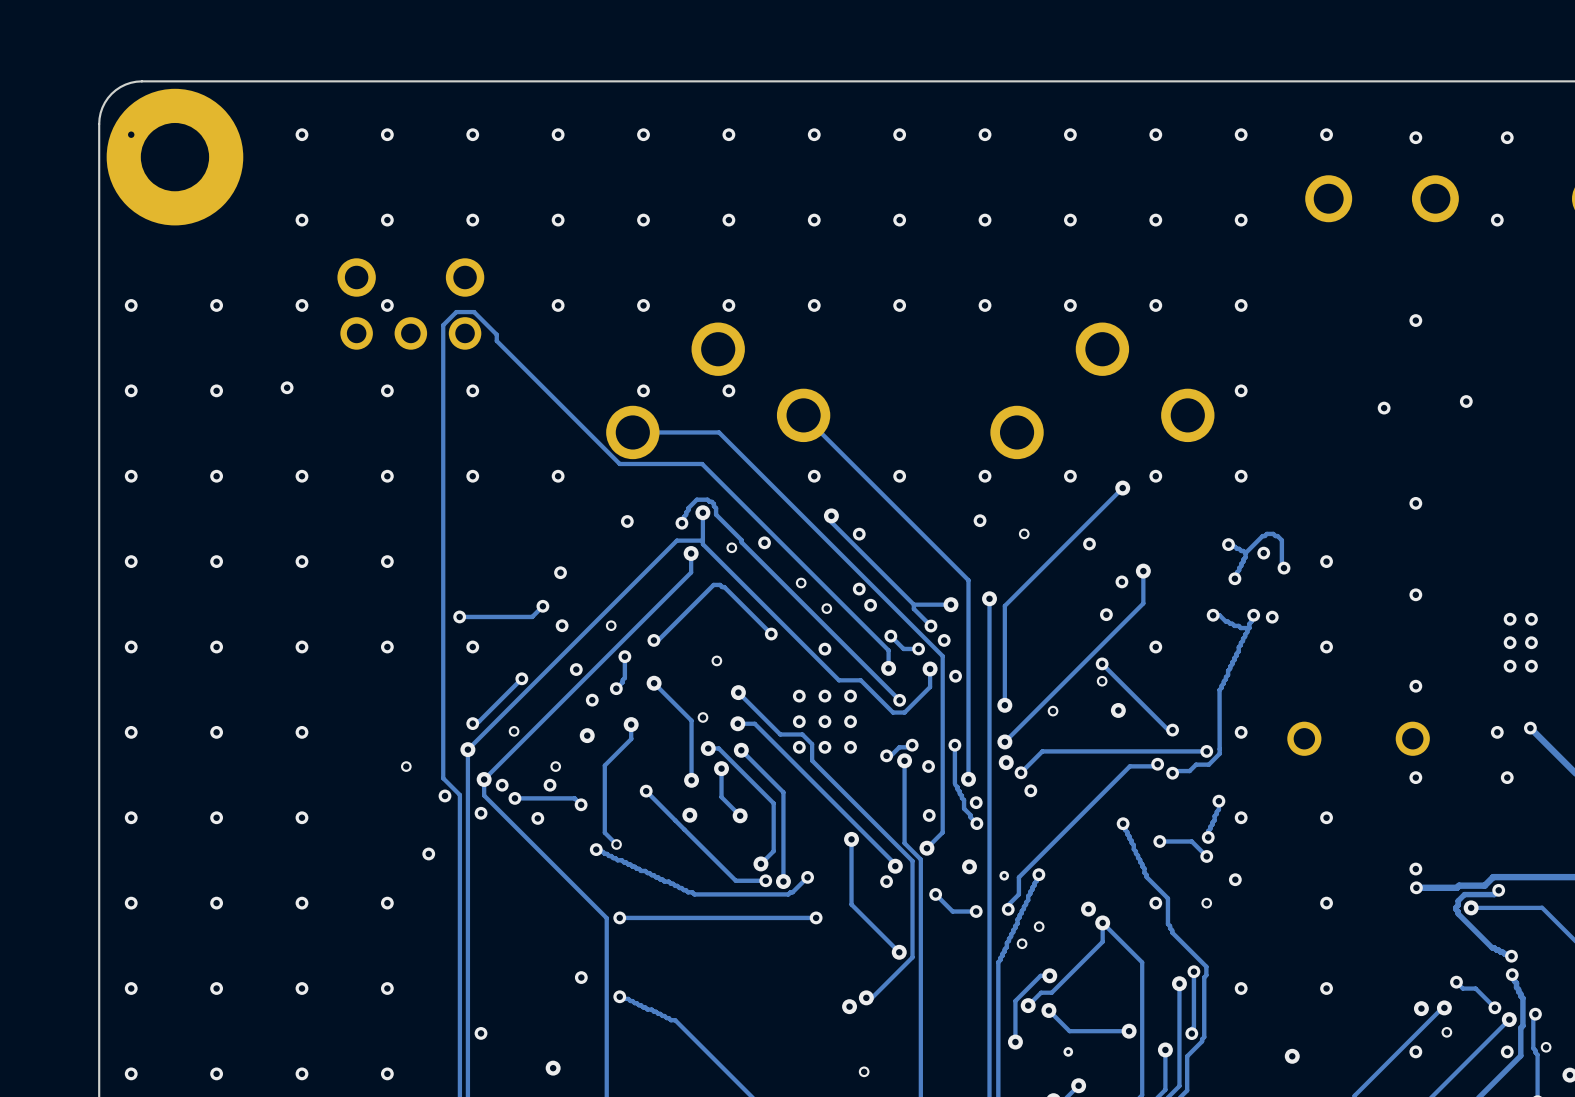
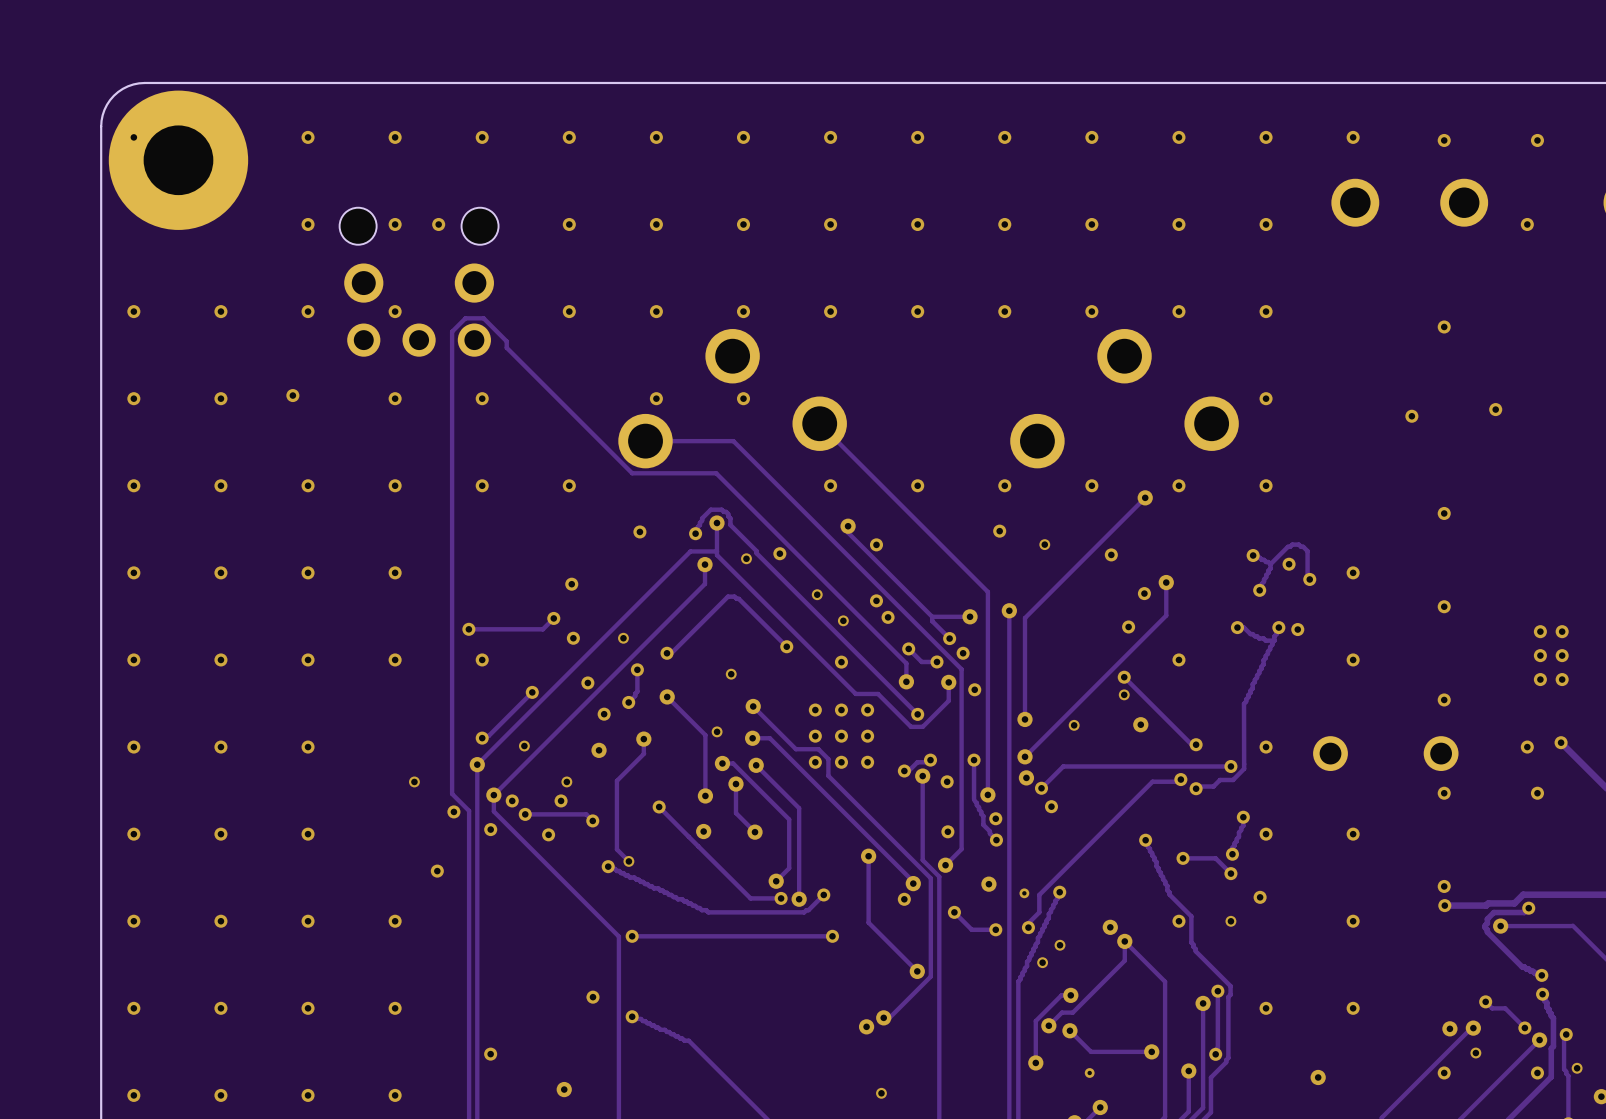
via position: (472, 220) -> (438, 224)
part: none -> (419, 282)

